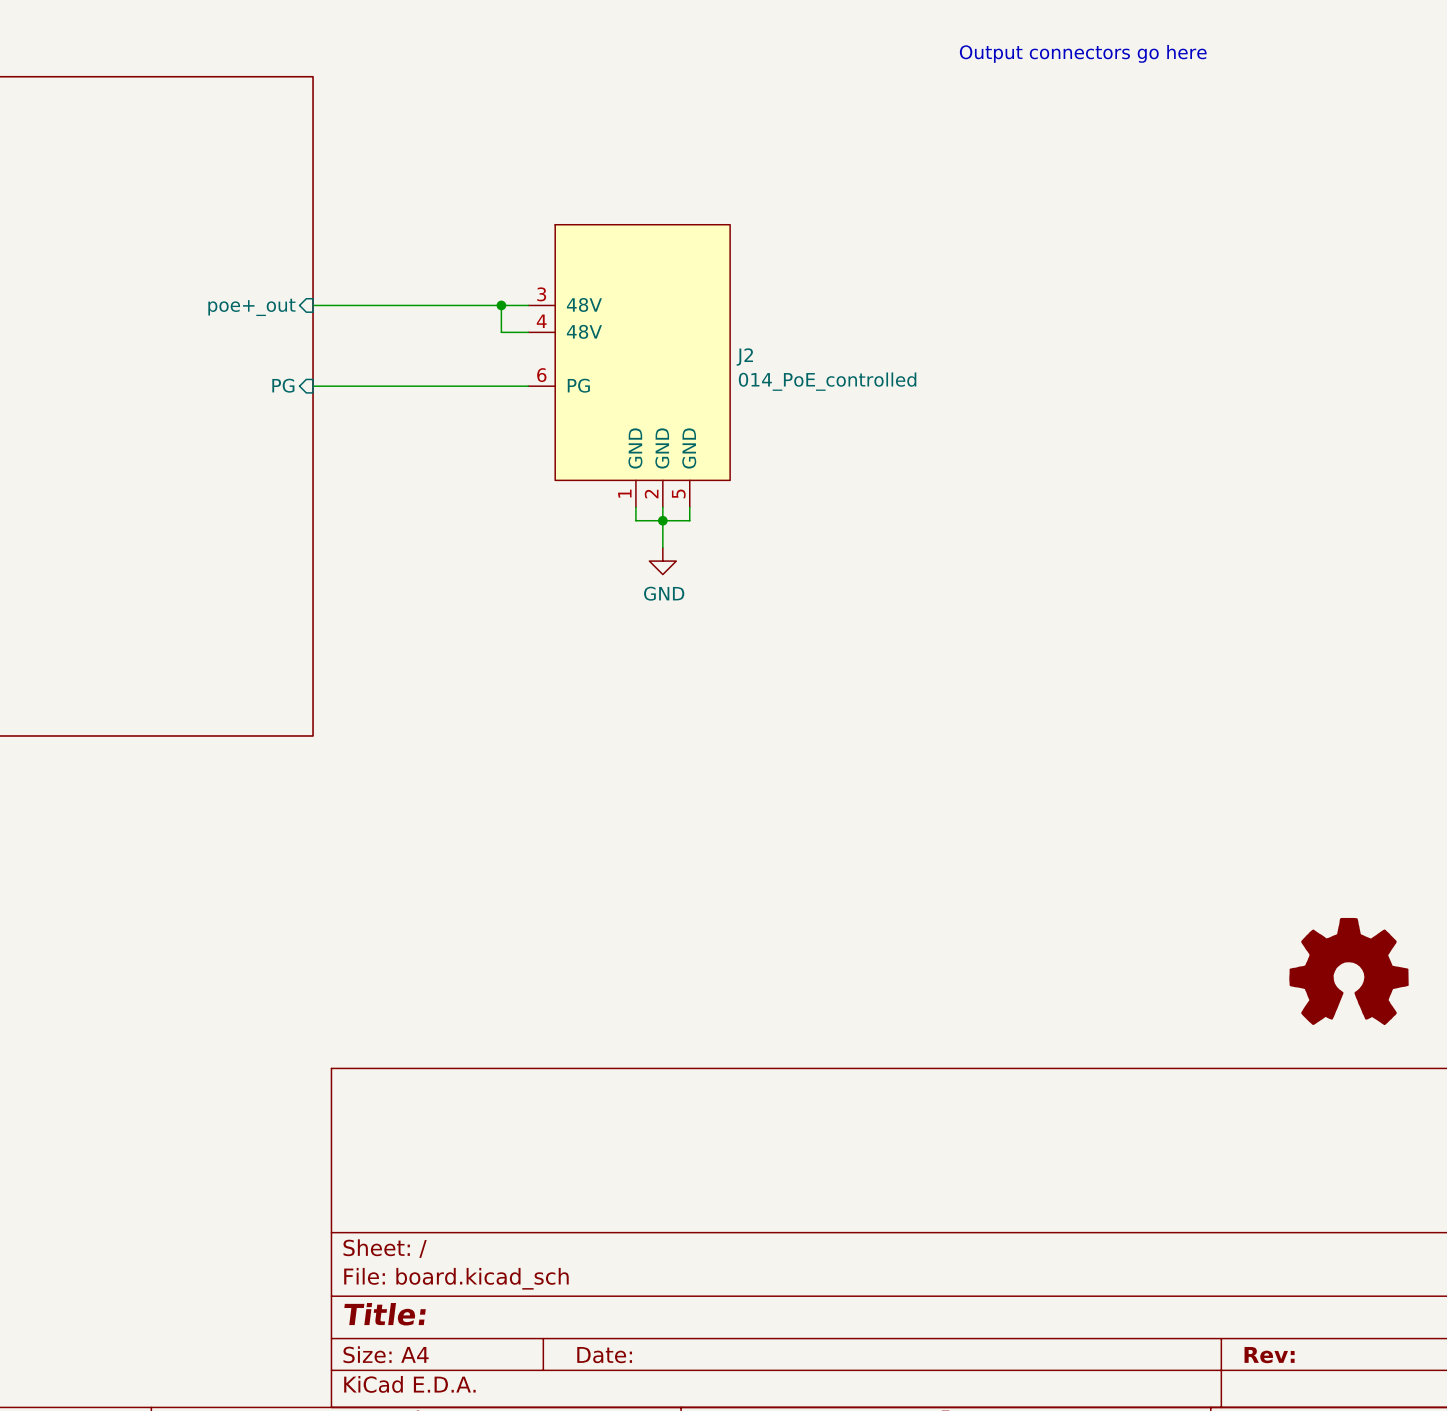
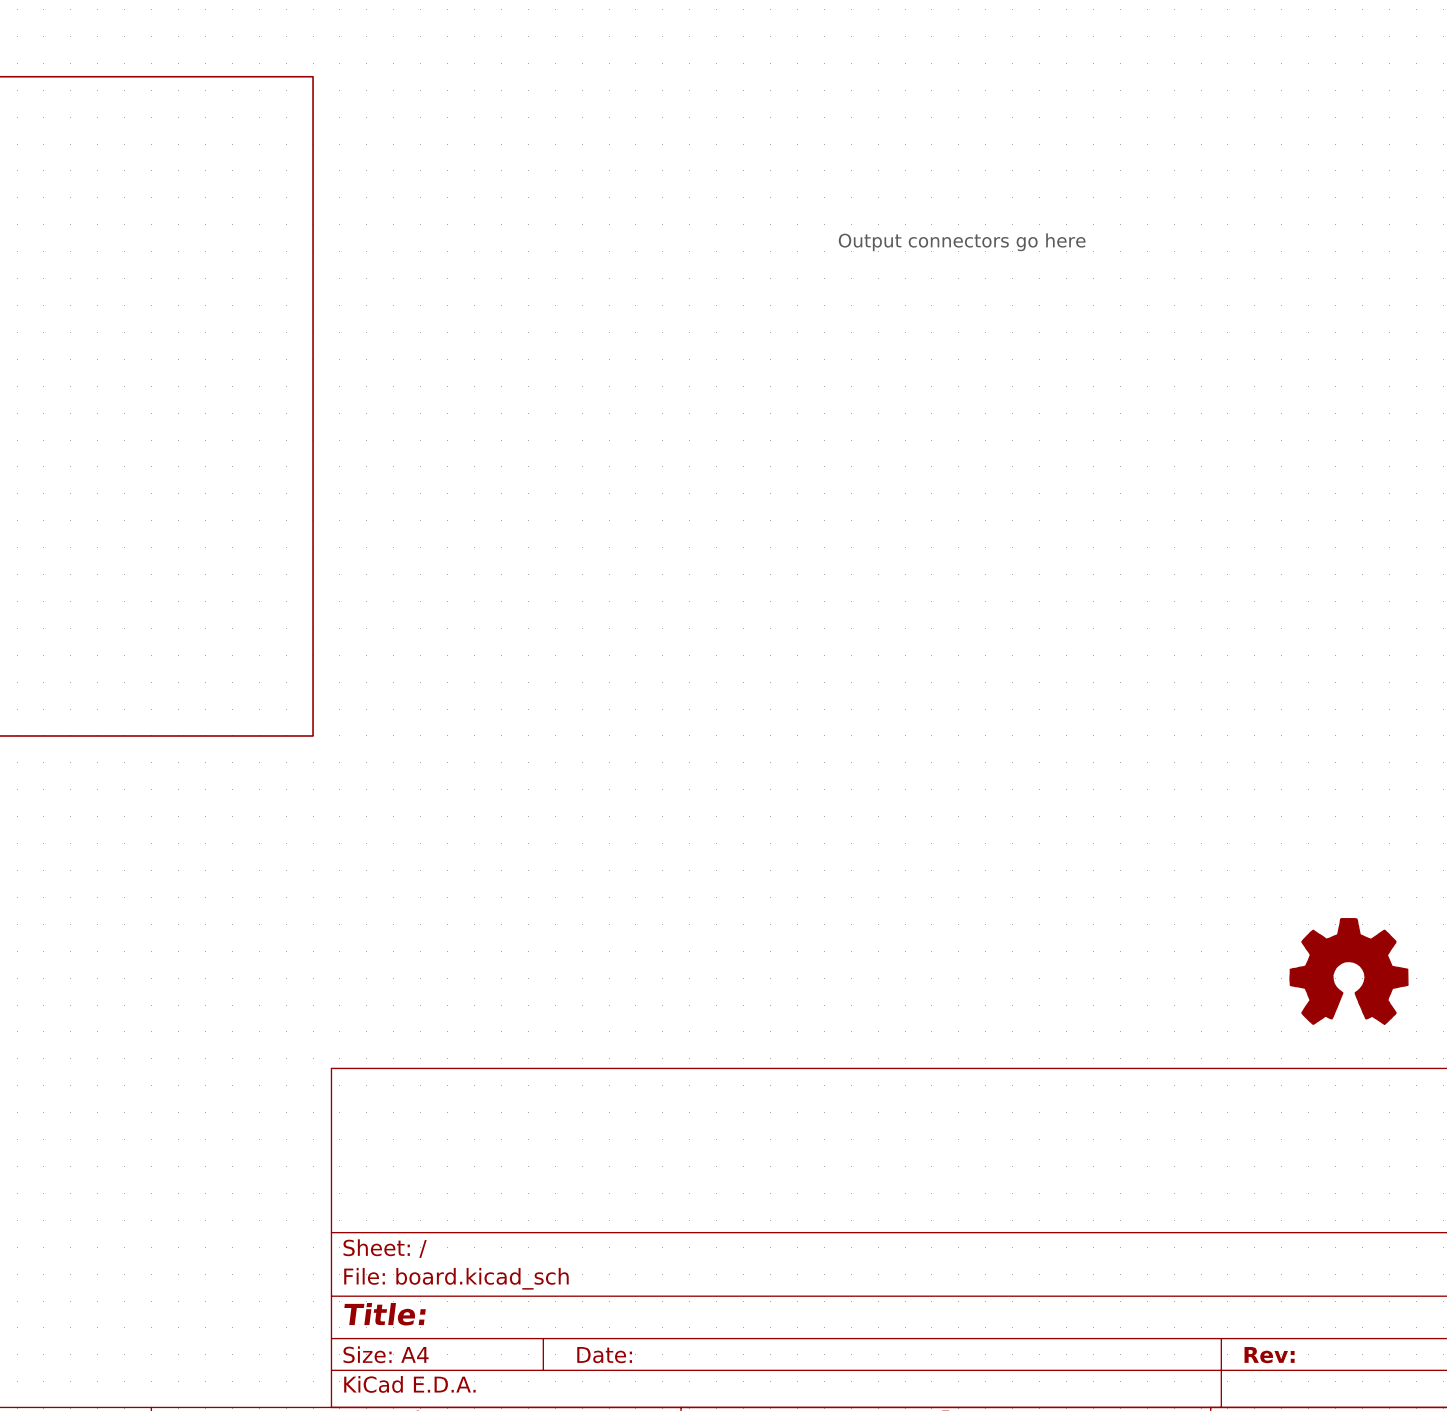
text position: Output connectors go here (1083, 53) -> Output connectors go here (962, 242)
wire: (313, 305) (528, 305) -> none
wire: (501, 305) (501, 332) (528, 332) -> none
junction: (501, 305) -> none
sheet pin: poe+_out (251, 307) -> none
J2: 014_PoE_controlled (629, 366) -> none
sheet pin: PG (283, 385) -> none
wire: (313, 386) (528, 386) -> none
wire: (635, 507) (635, 520) (689, 520) (689, 507) -> none
wire: (662, 507) (662, 547) -> none
junction: (662, 520) -> none
power symbol: GND (662, 561) -> none

